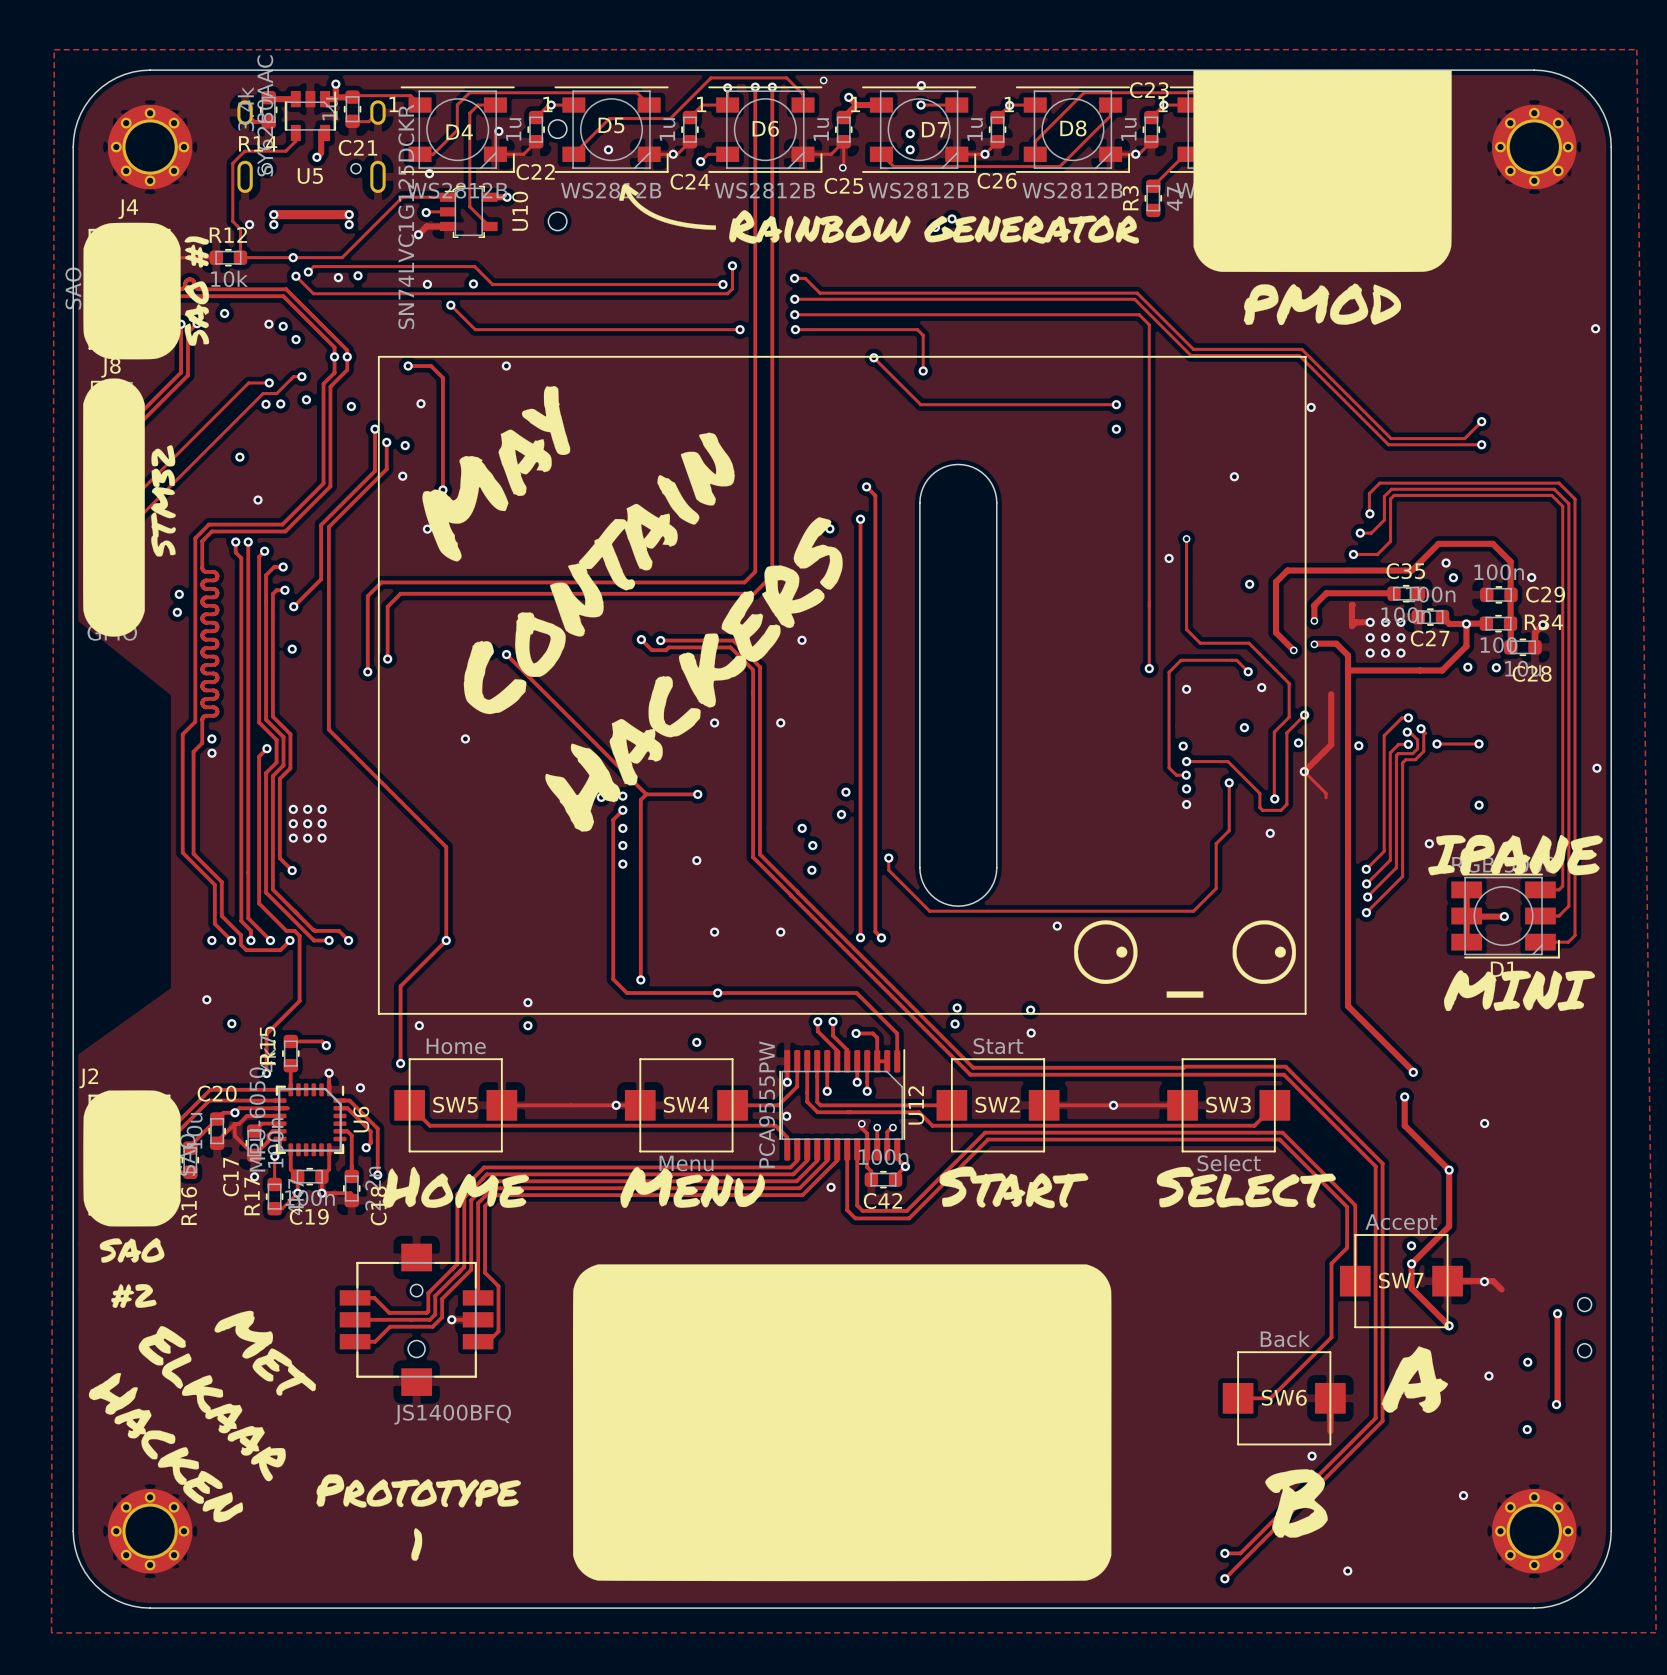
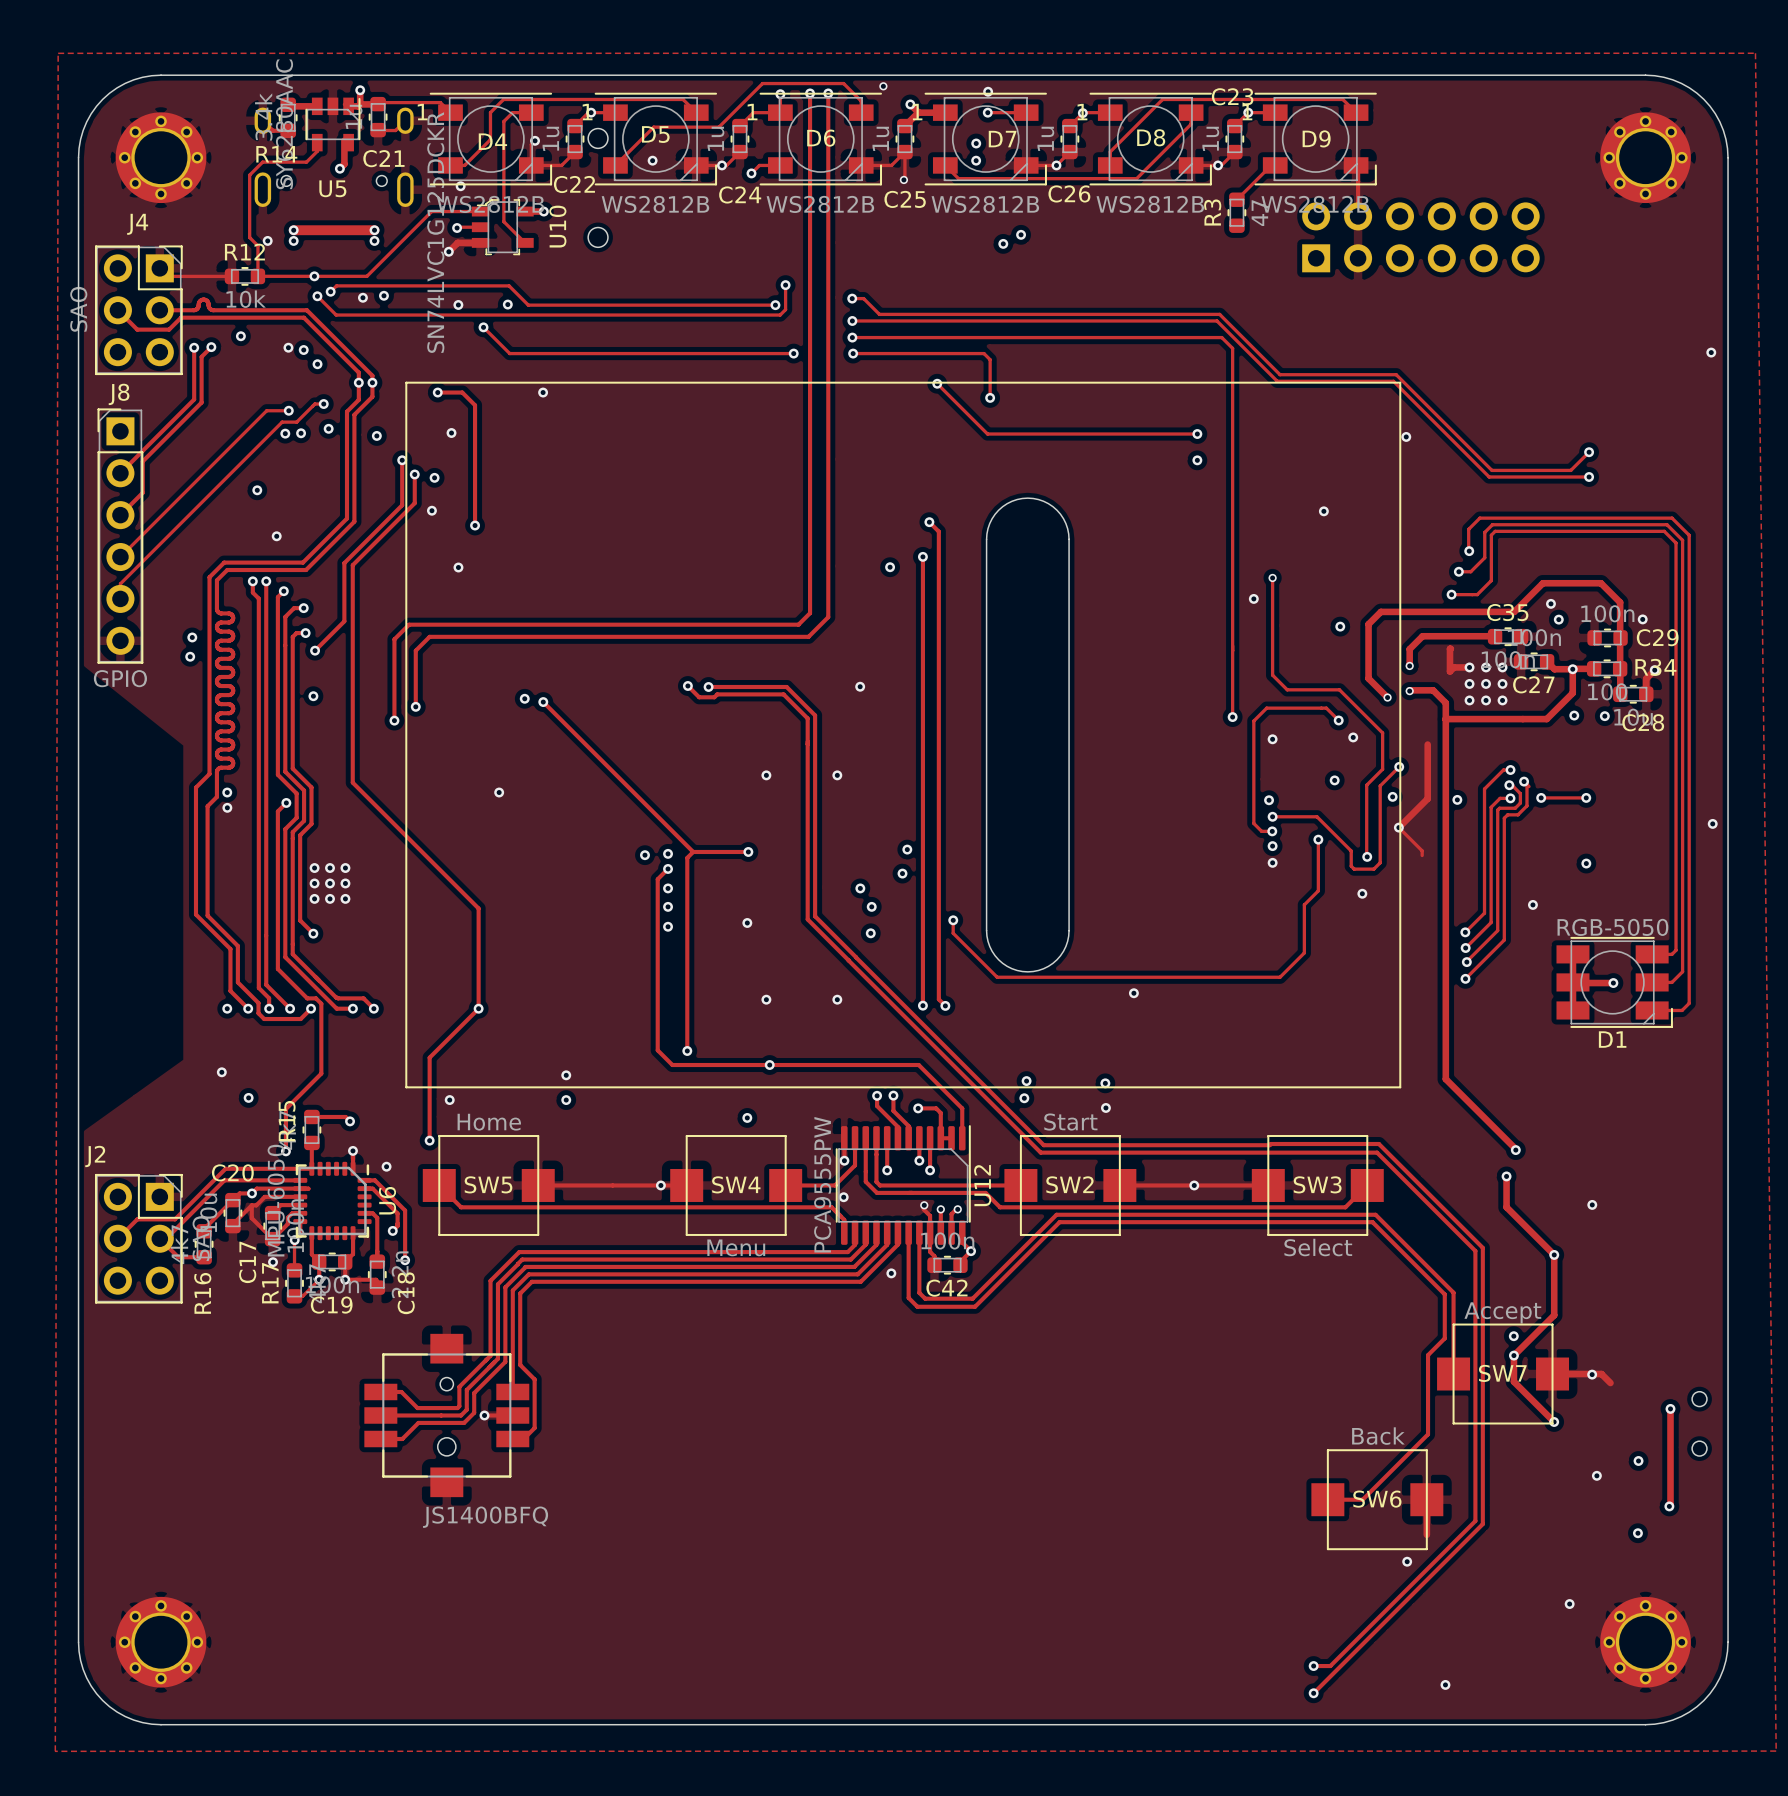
drawing: [83, 70, 1603, 1582] -> none

